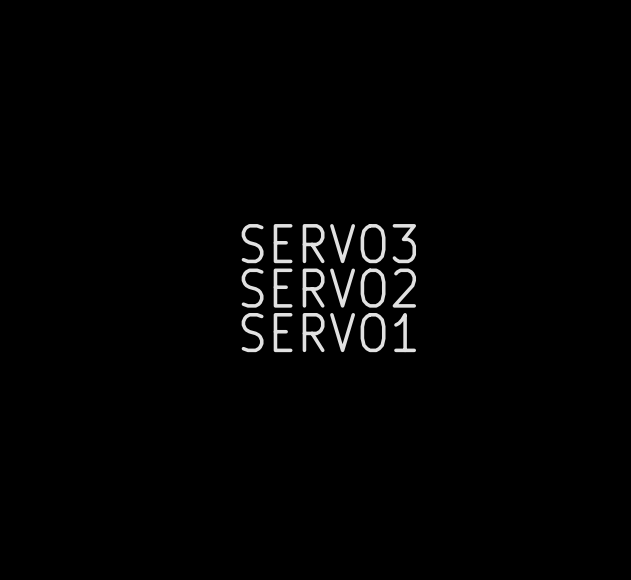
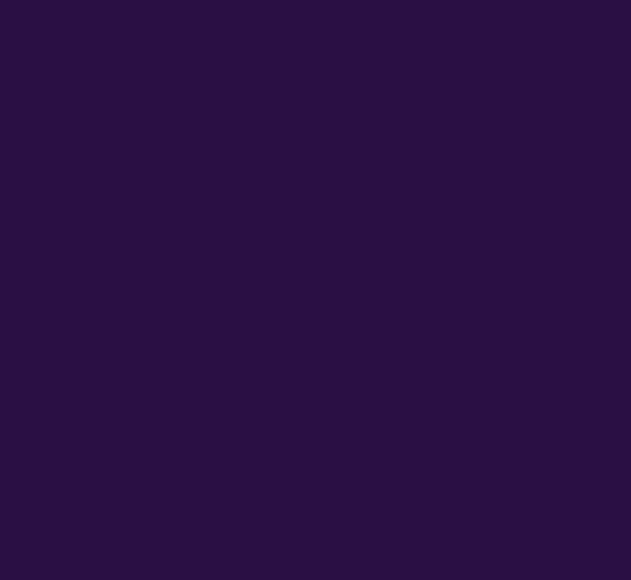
text: SERVO3 (328, 243) -> none
text: SERVO2 (328, 288) -> none
text: SERVO1 (328, 332) -> none

